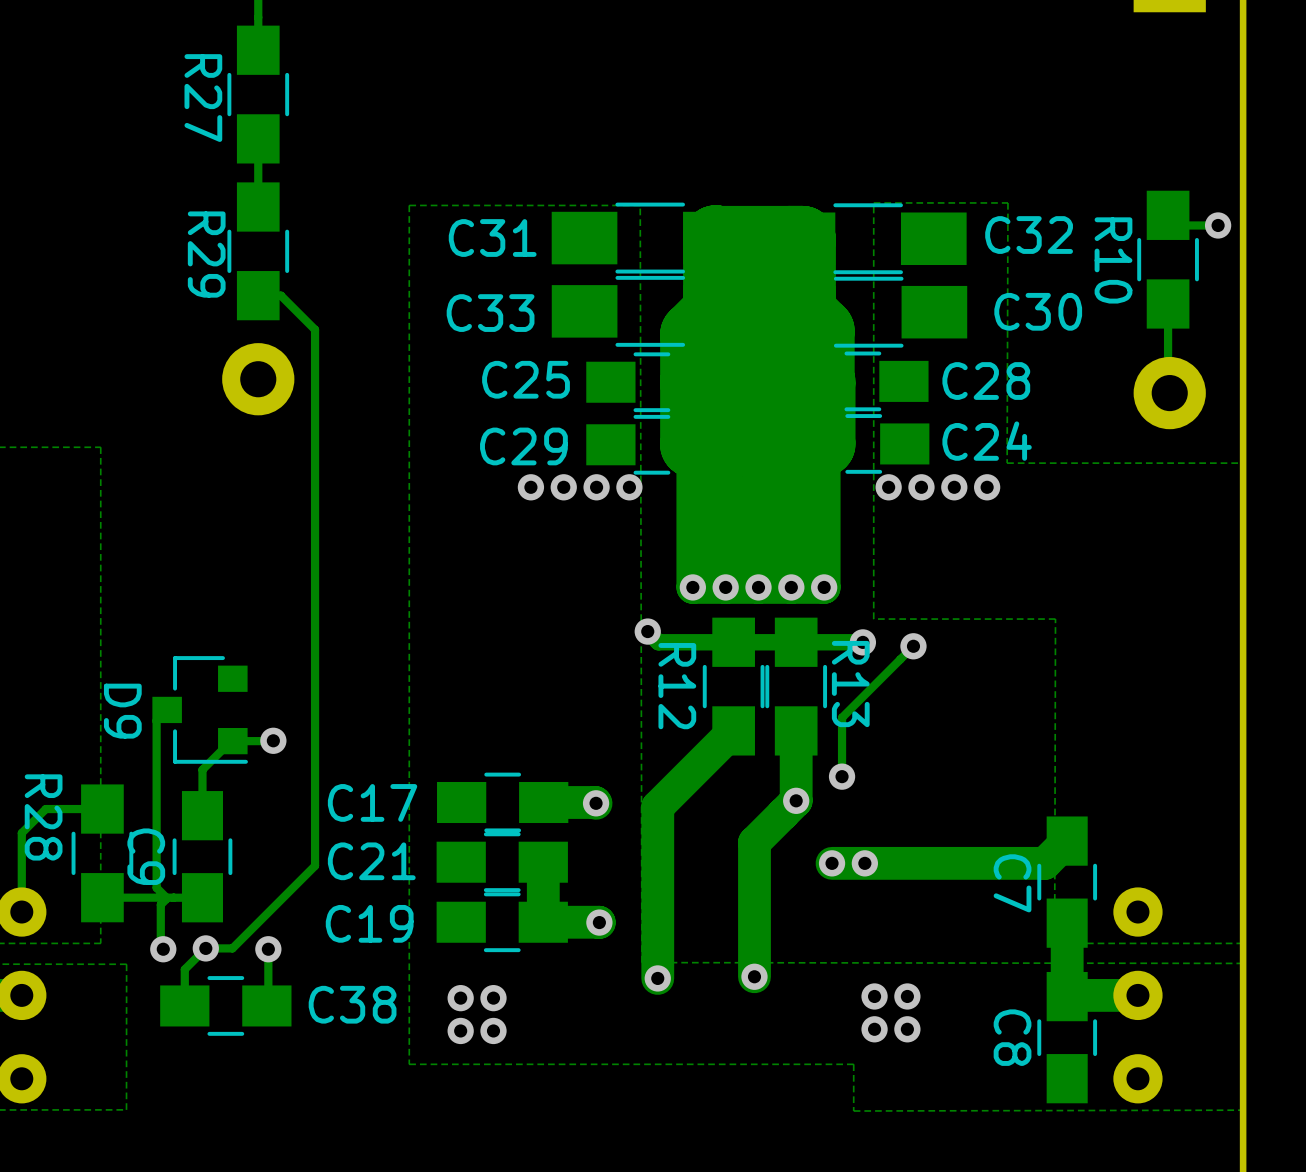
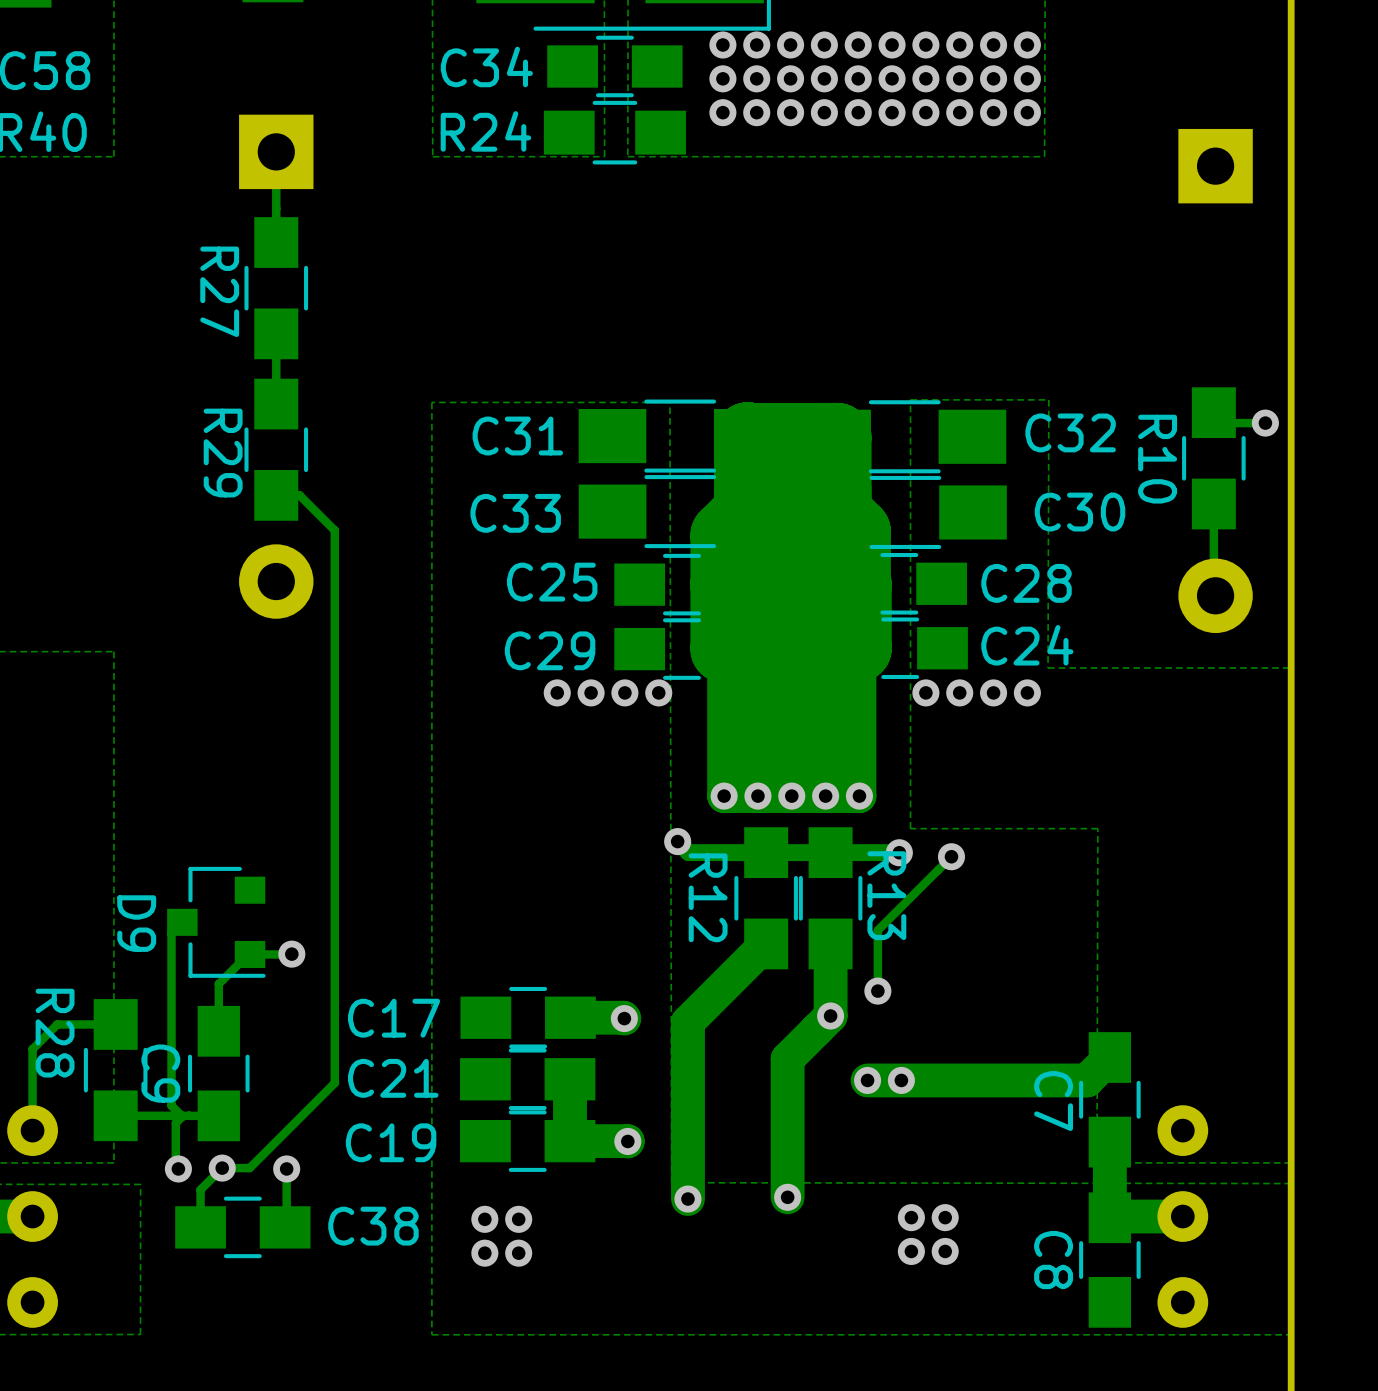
zone outline: (409, 1064) (853, 1064) (853, 1111) (1243, 1110) -> (431, 1287) (431, 1334) (1291, 1334)

